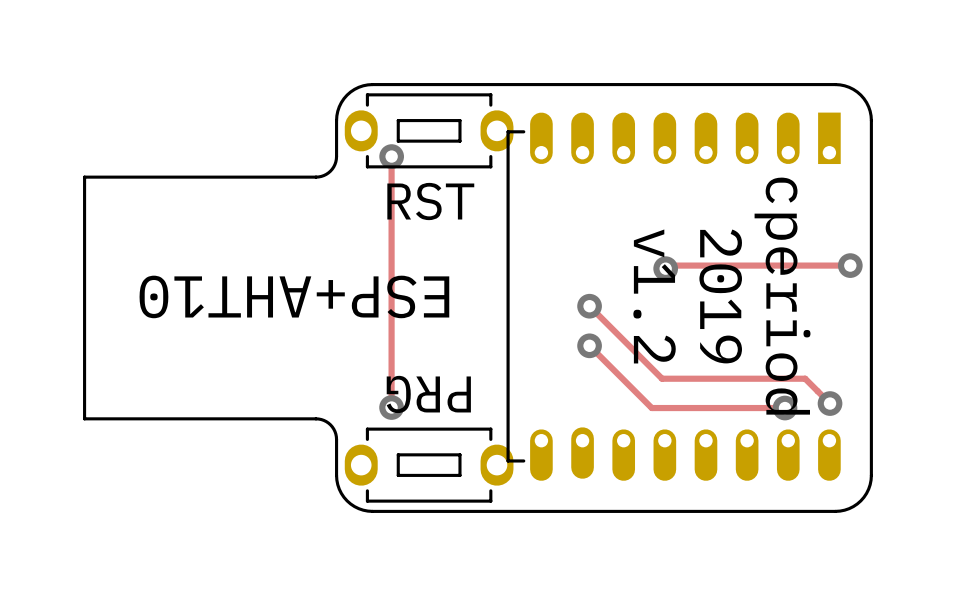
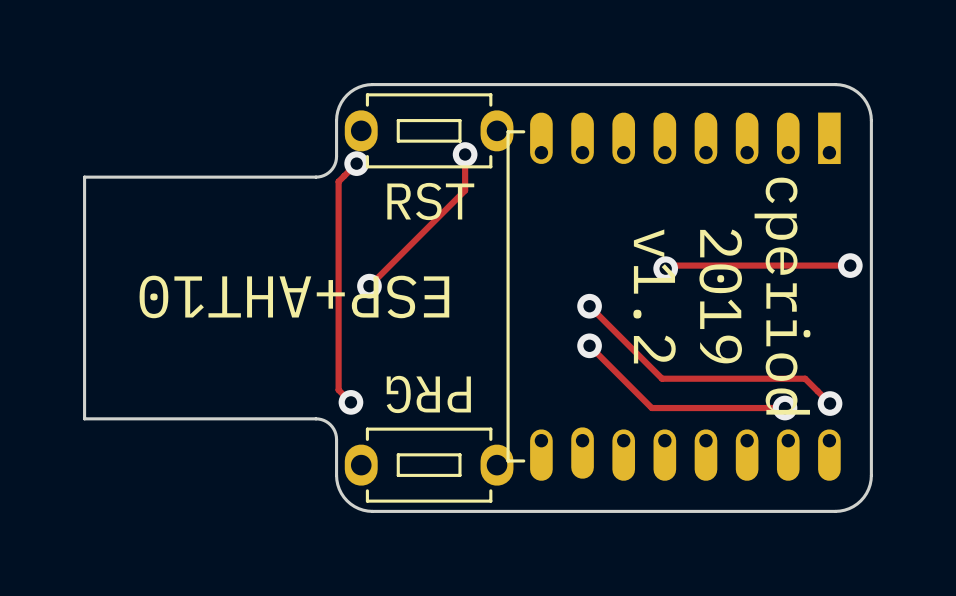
track: none -> (465, 154) (465, 190) (369, 286)
via: none -> (465, 154)
track: (391, 156) (391, 407) -> none
via position: (391, 156) -> (356, 163)
track: none -> (356, 163) (338, 181) (338, 390) (350, 402)
via: none -> (369, 286)
via position: (391, 407) -> (350, 402)

